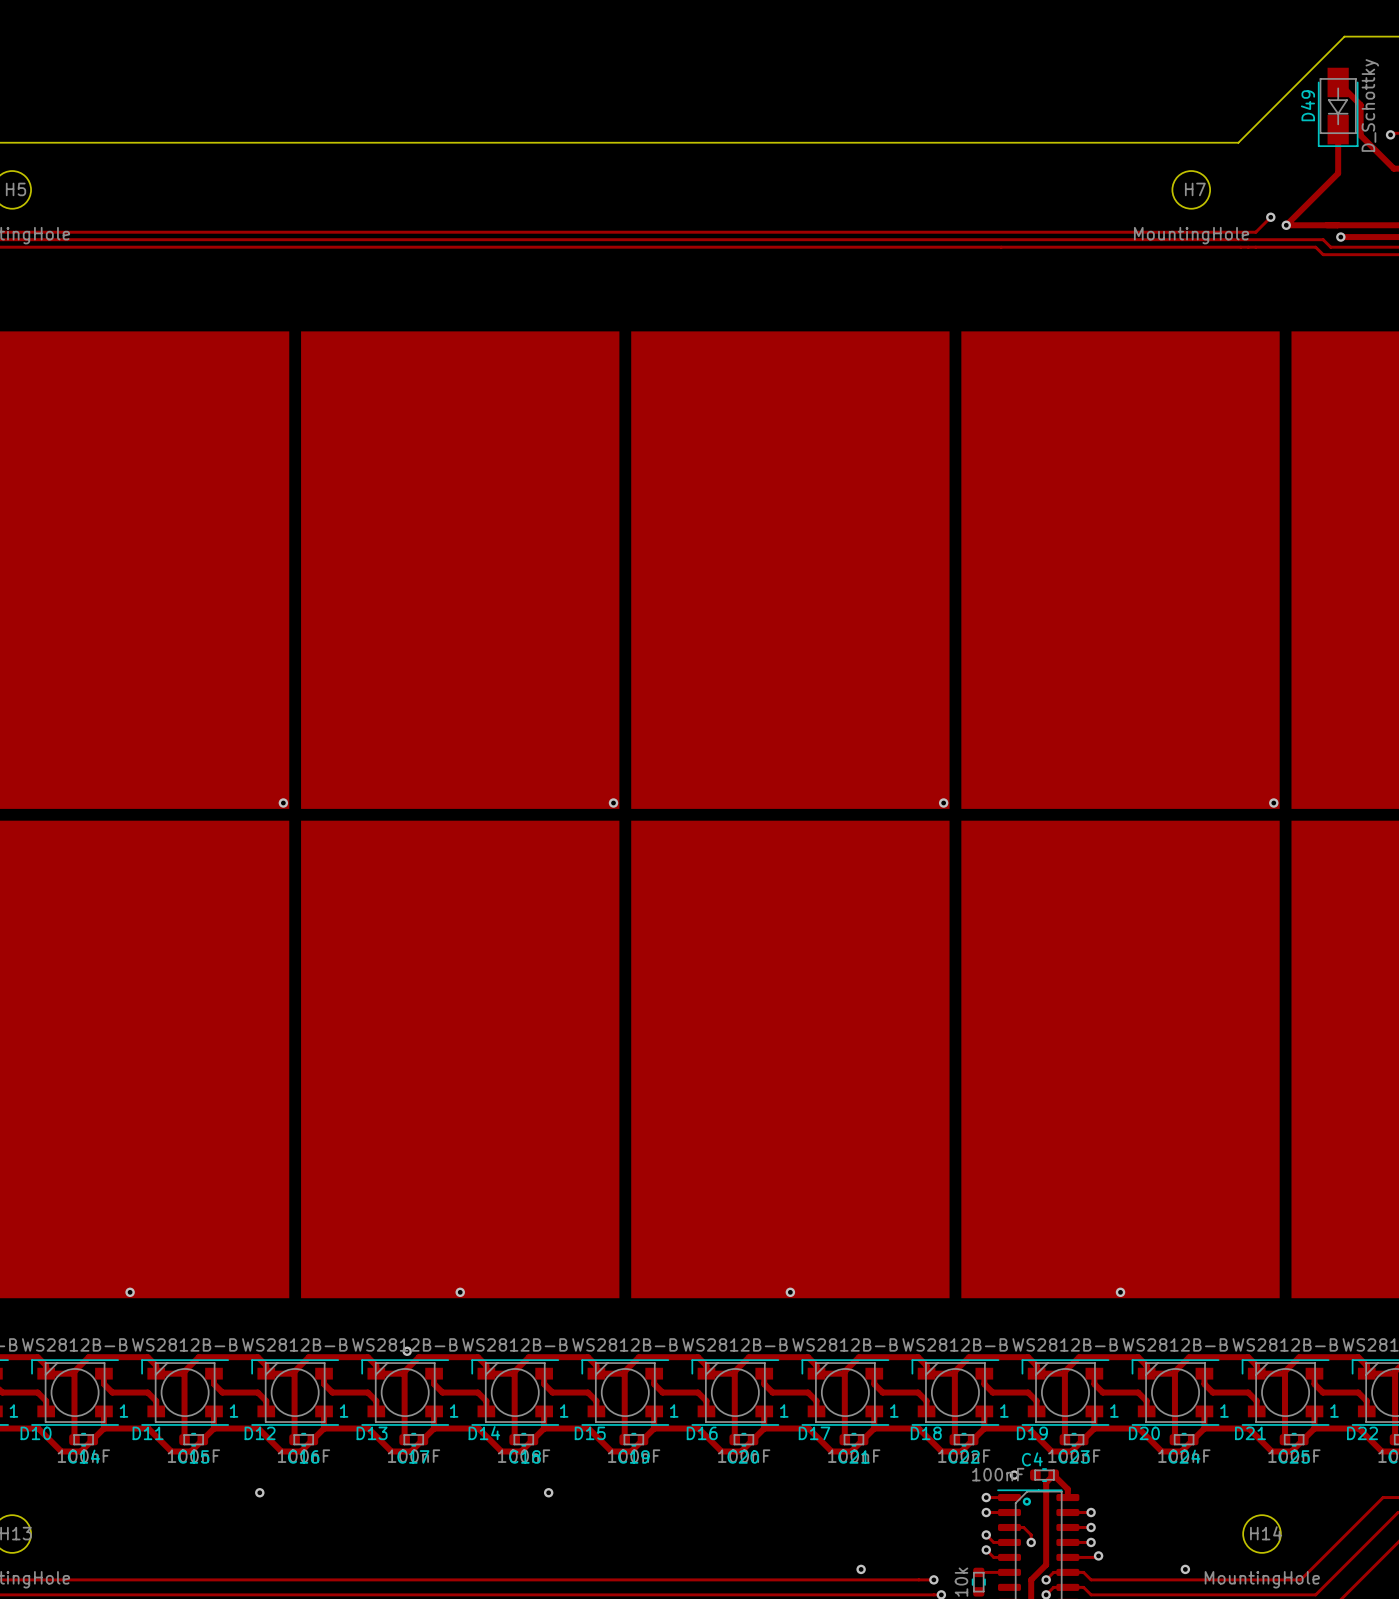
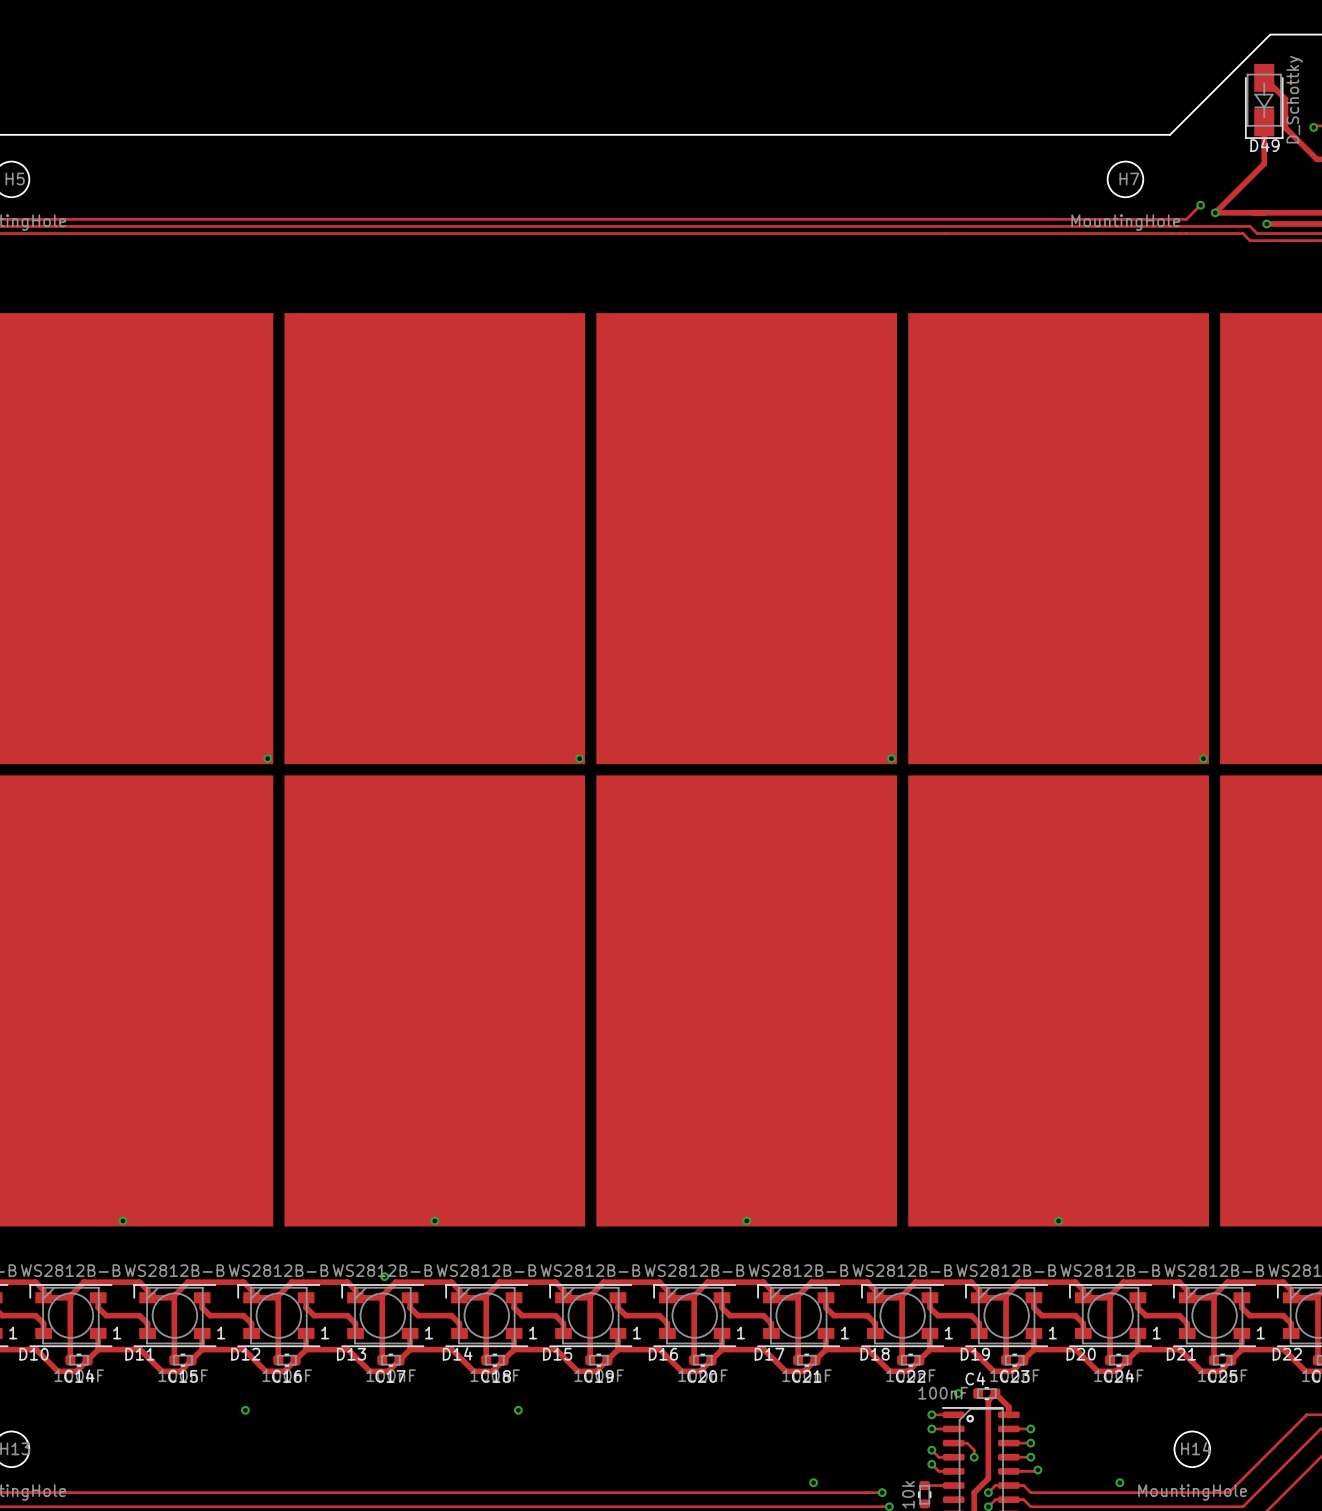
D49 name rotation: 0° (1307, 105) -> 90° clockwise (1264, 145)
D49 name position: D49 (1307, 105) -> D49 (1264, 145)

